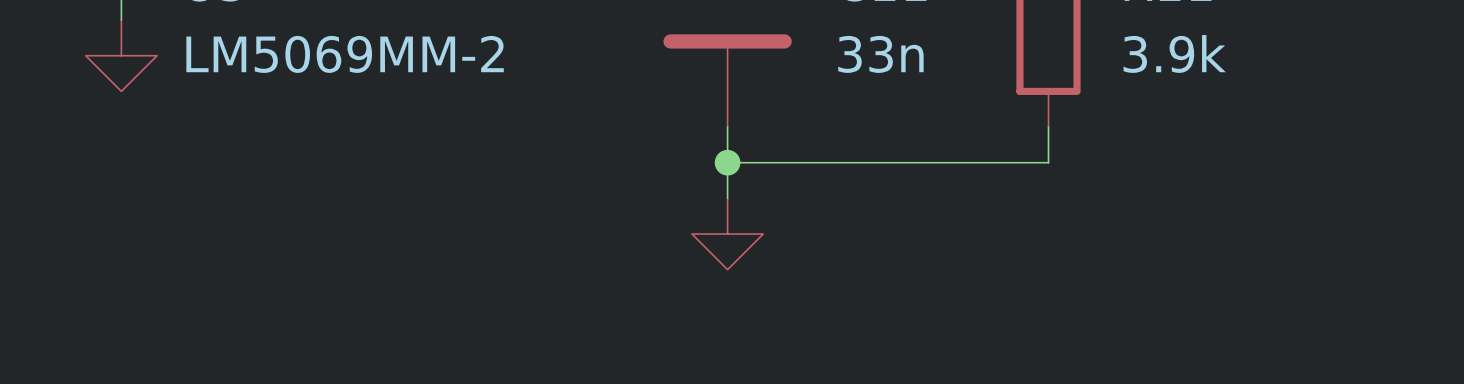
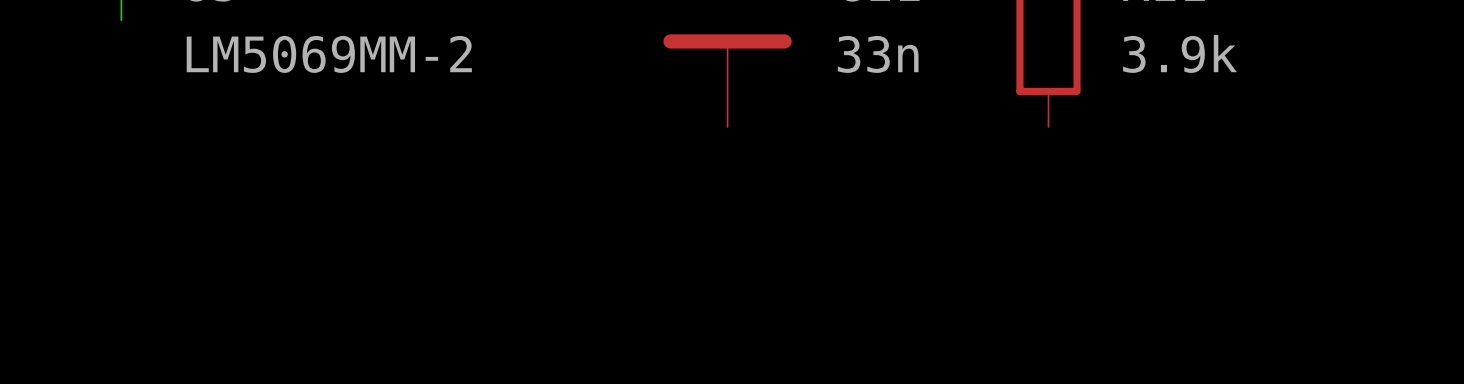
power symbol: (121, 55) -> none
wire: (727, 127) (727, 198) -> none
wire: (1048, 127) (1048, 162) (727, 162) -> none
junction: (727, 162) -> none
power symbol: (727, 234) -> none

